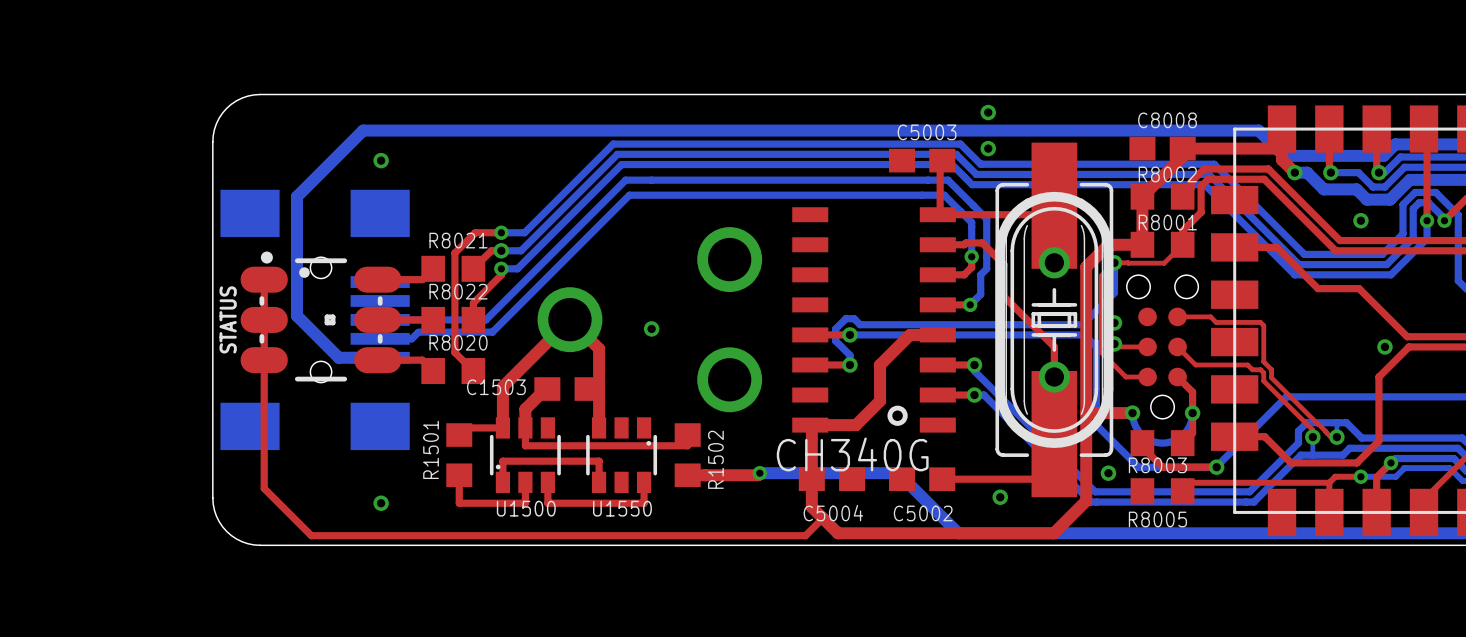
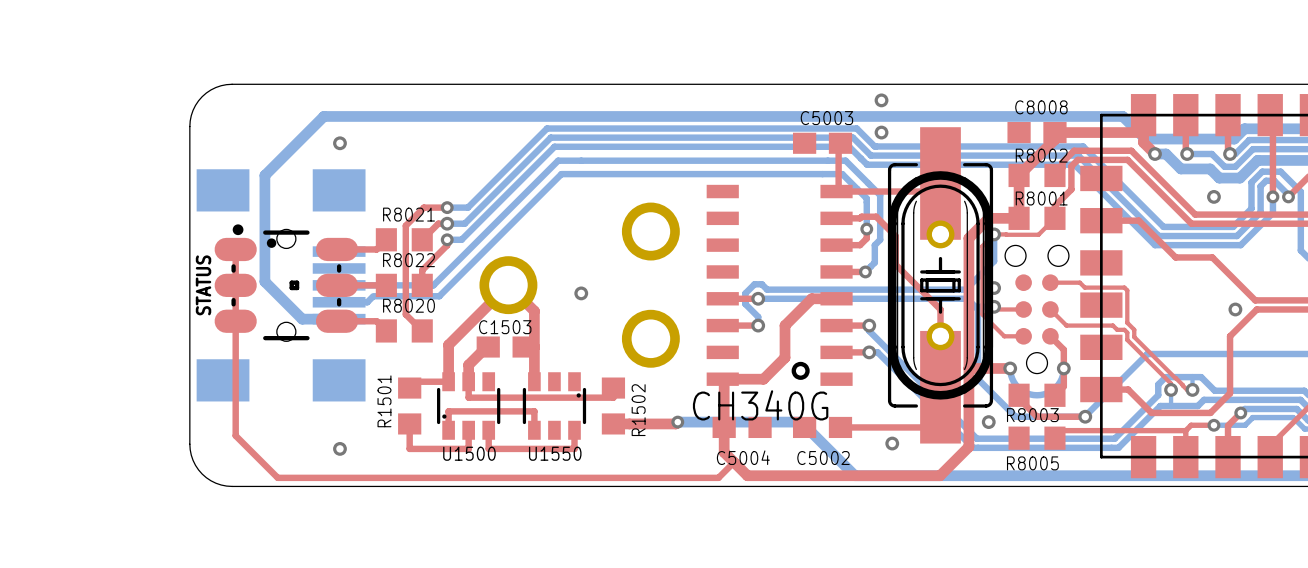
C1503 name position: C1503 (496, 387) -> C1503 (505, 327)

